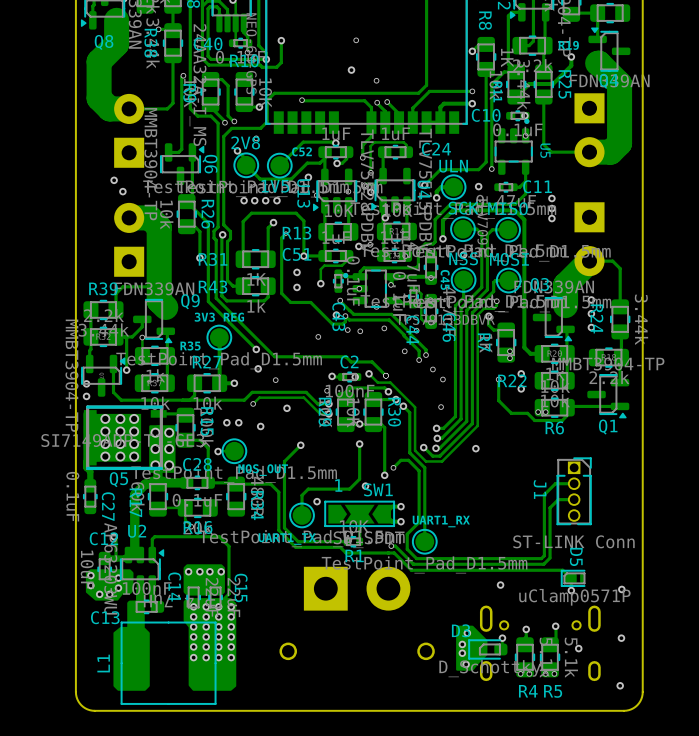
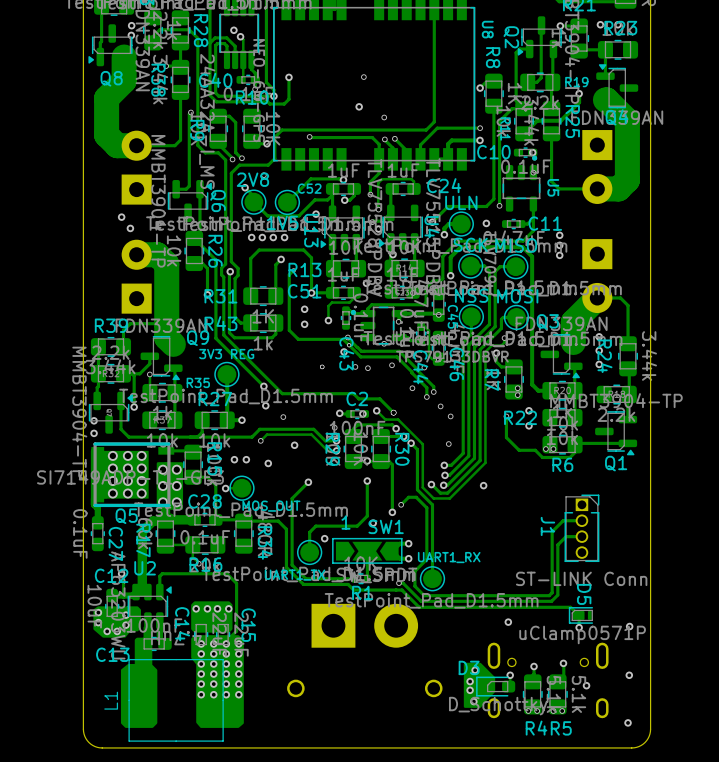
via: (359, 288) -> none
track: (310, 302) (332, 324) (343, 324) (345, 321) (345, 316) (349, 320) (353, 320) -> (318, 339) (343, 339) (360, 356)
via: none -> (349, 345)
via: (345, 316) -> none
via: none -> (322, 366)
via: (318, 336) -> none

